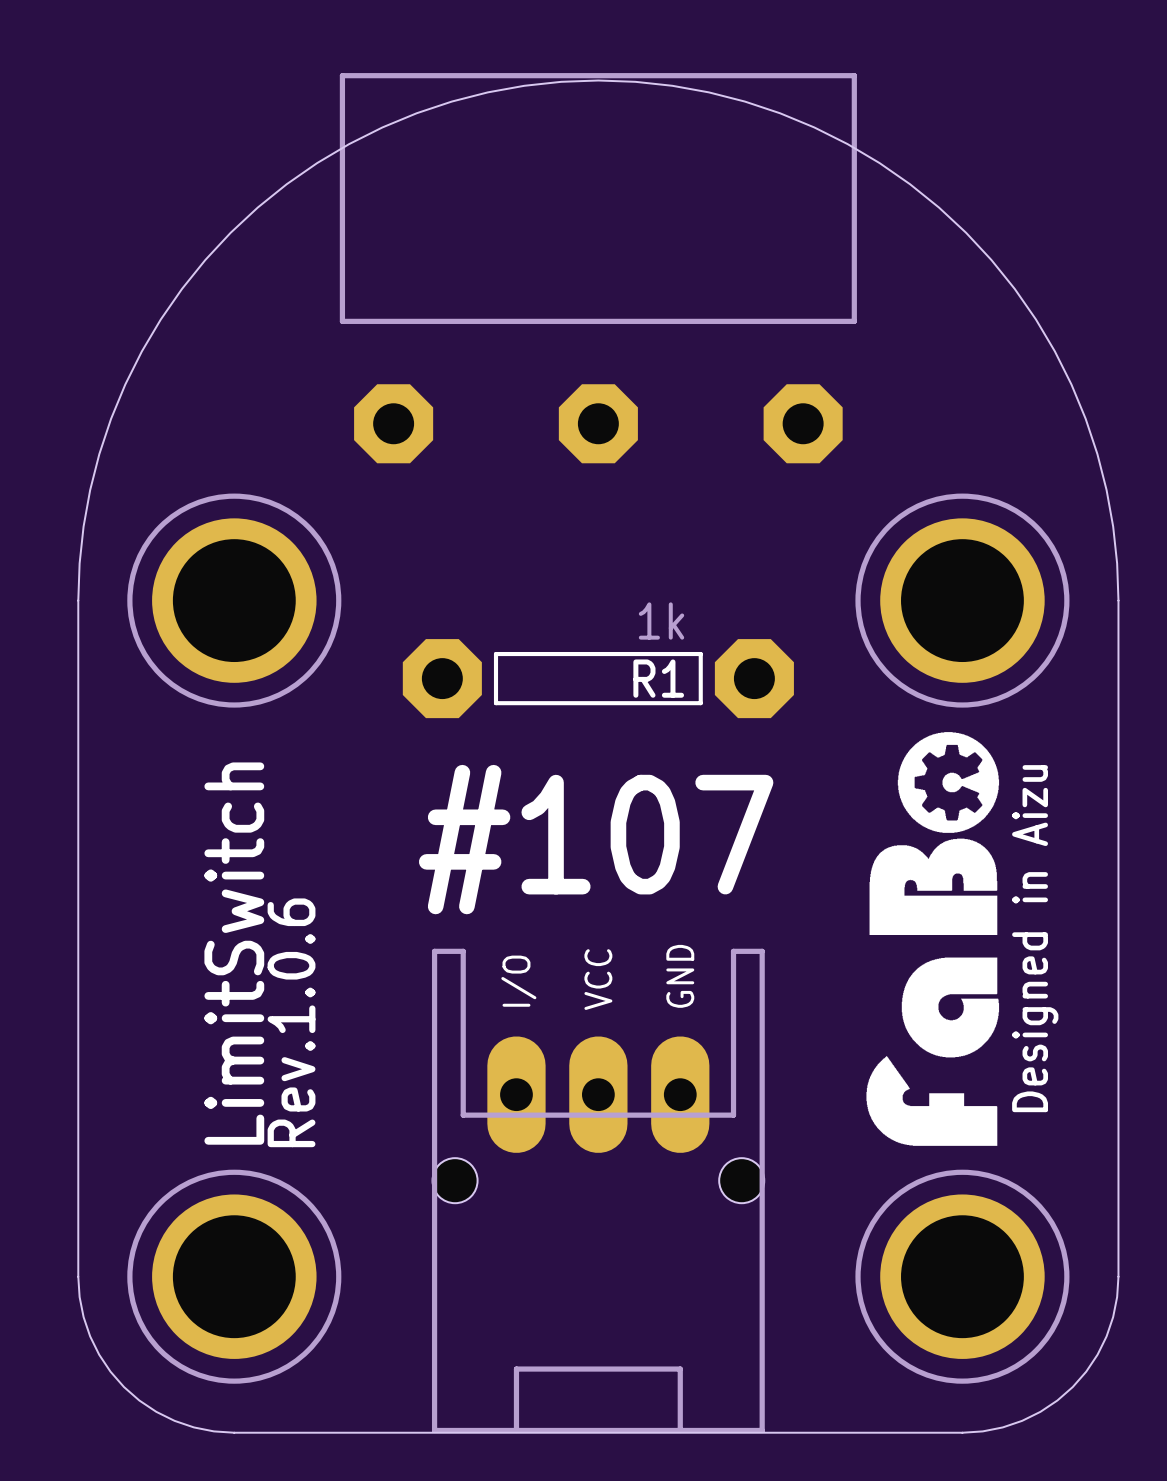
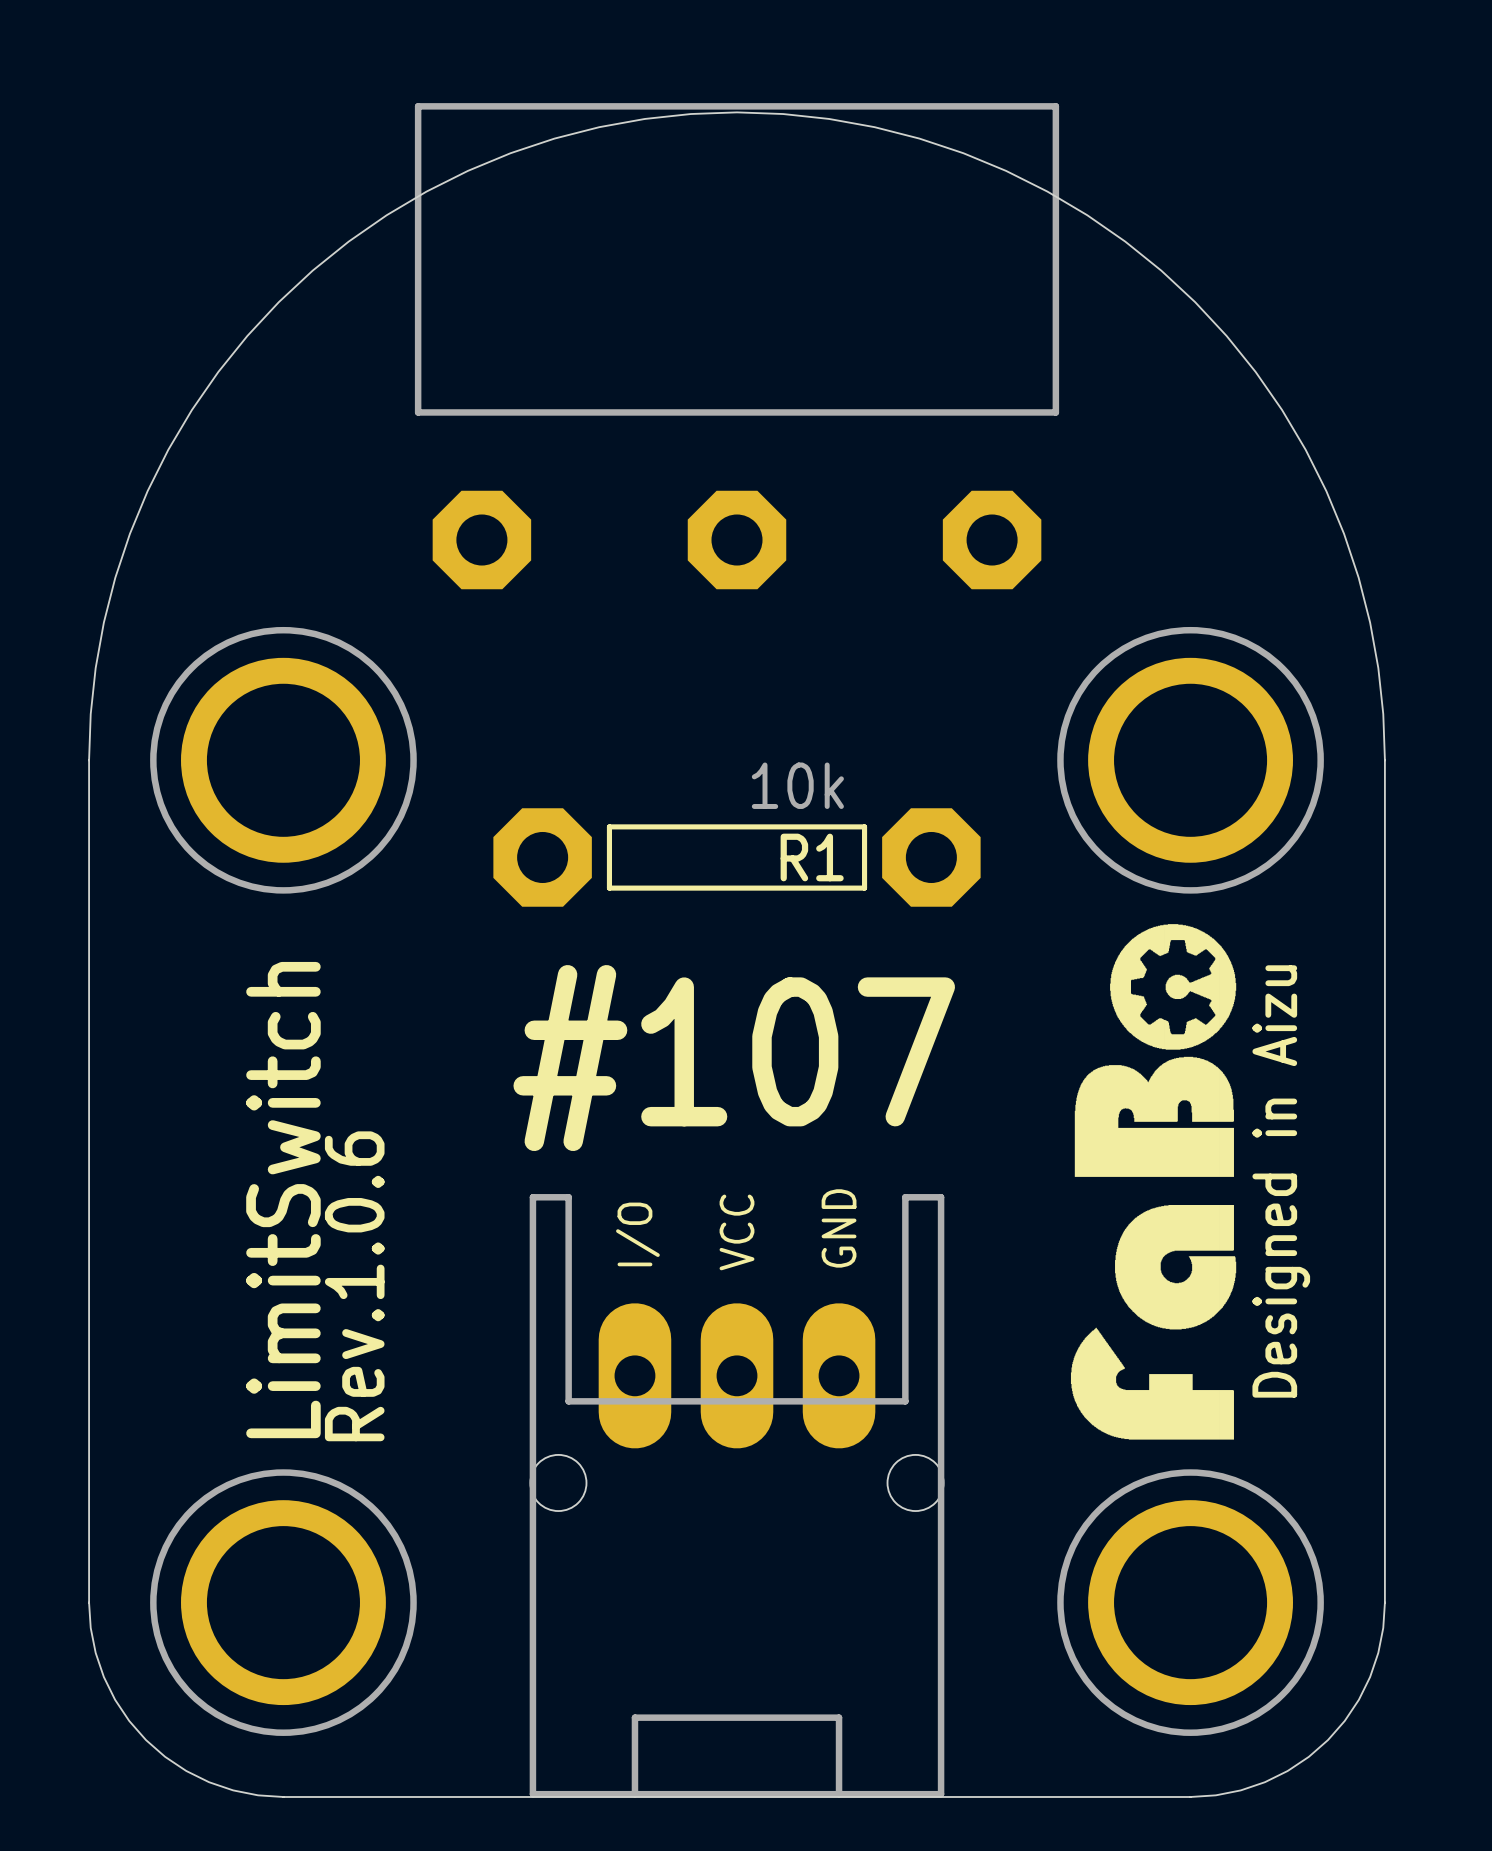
R1 value: 1k (661, 621) -> 10k (797, 785)

